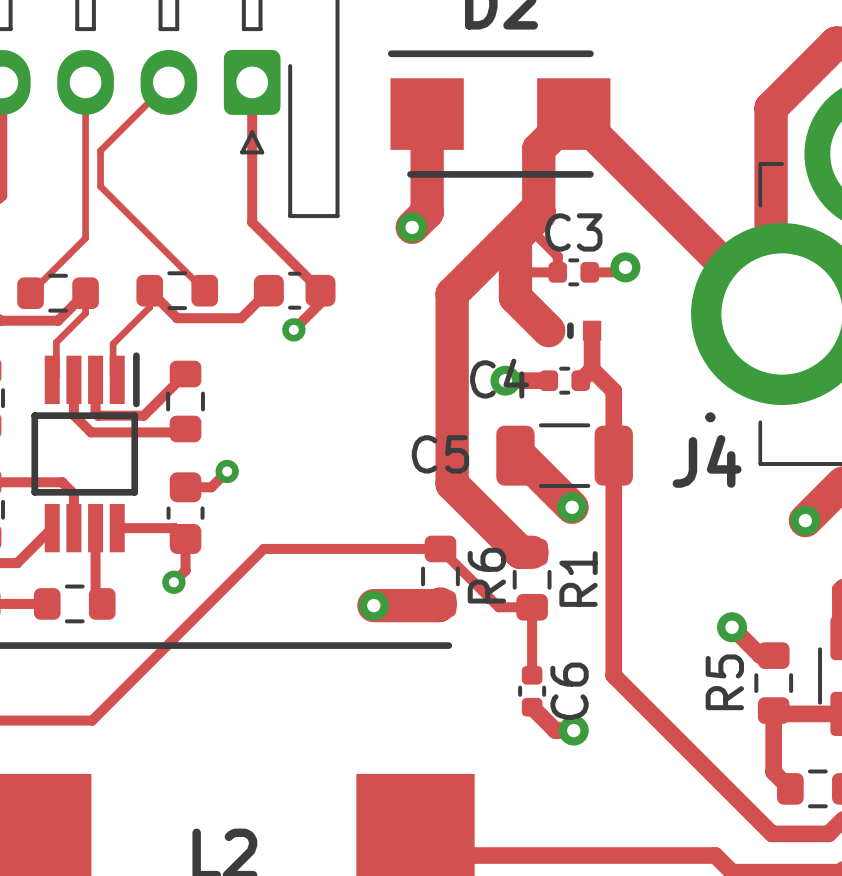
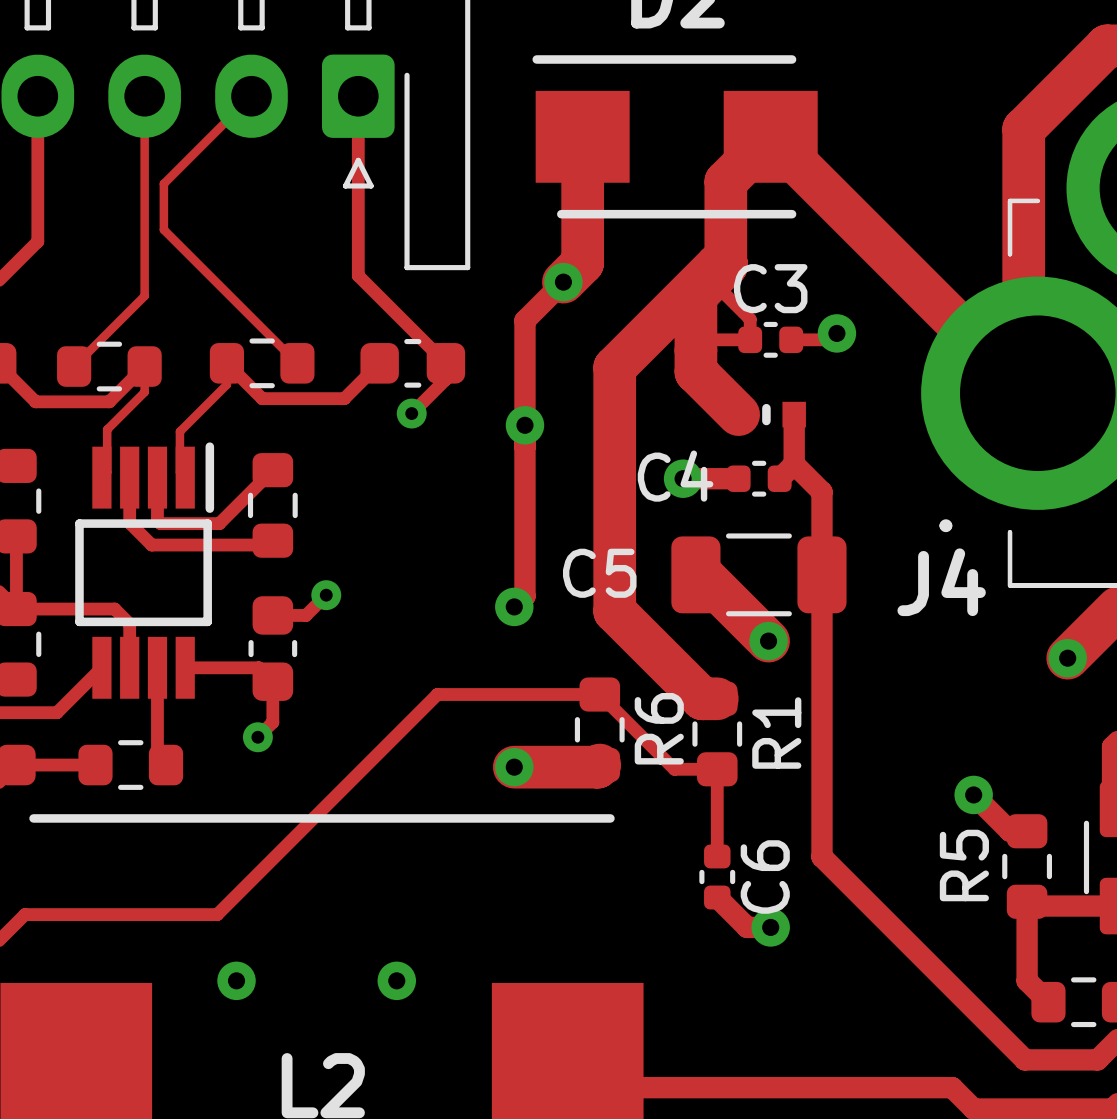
top track: none -> (563, 282) (524, 320) (524, 596) (514, 606)
via: none -> (524, 425)
via: none -> (514, 606)
top track: (313, 548) (263, 548) (92, 720) -> (437, 694) (217, 914) (153, 914)
via: none -> (236, 980)
via: none -> (396, 980)

